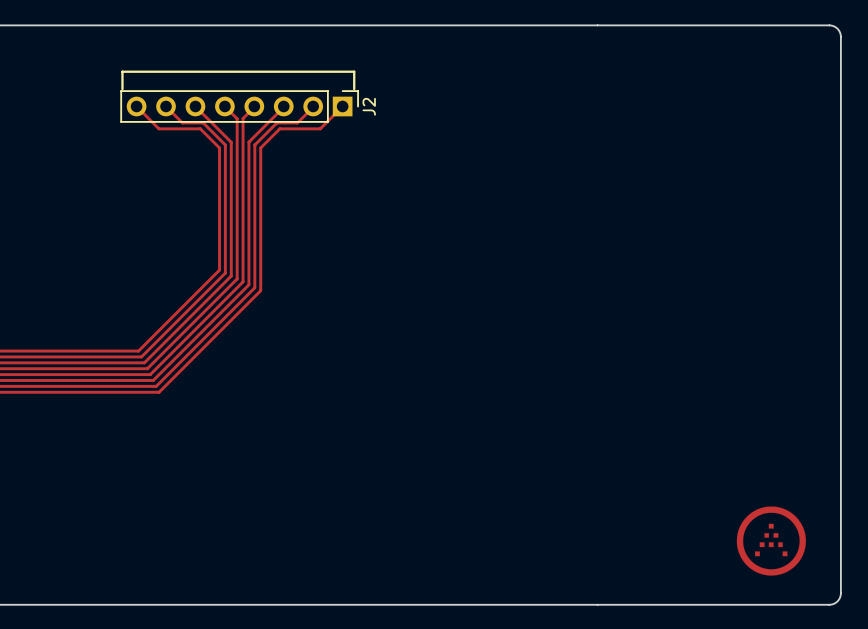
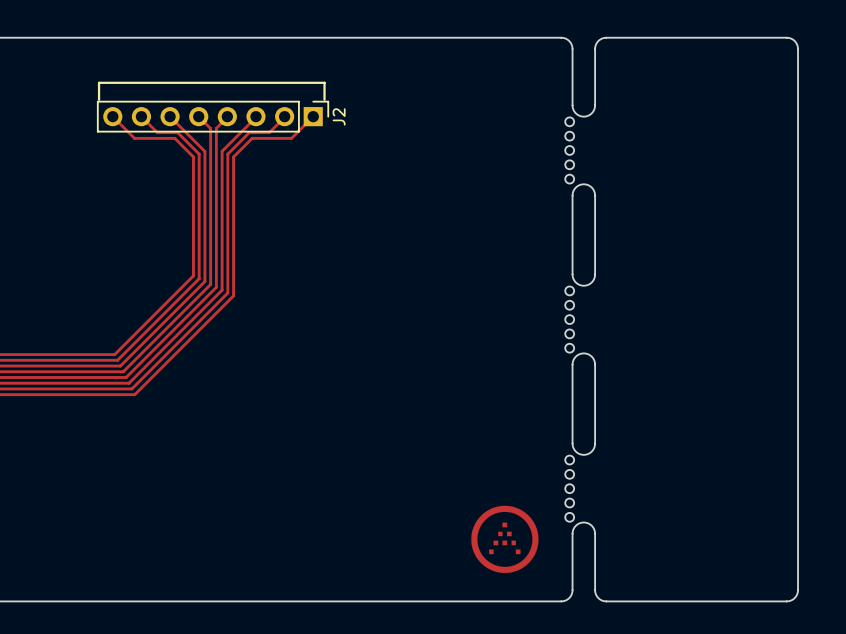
board edge: (597, 25) (643, 25) -> (561, 37) (568, 40) (572, 46) (572, 106) (575, 113) (583, 116) (590, 114) (594, 108) (595, 47) (598, 41) (606, 37)
part: none -> (569, 150)
board edge: none -> (572, 195) (572, 275) (576, 283) (585, 285) (591, 282) (595, 275) (595, 194) (591, 187) (583, 184) (575, 187) (572, 195)
part: none -> (569, 319)
board edge: none -> (572, 364) (572, 445) (576, 452) (585, 454) (591, 451) (595, 445) (595, 363) (591, 356) (583, 353) (575, 356) (572, 364)
part: none -> (569, 488)
drawing position: (771, 541) -> (504, 539)
board edge: (597, 604) (643, 604) -> (561, 601) (568, 599) (572, 593) (572, 532) (575, 525) (583, 522) (590, 524) (594, 530) (595, 591) (598, 598) (606, 601)

